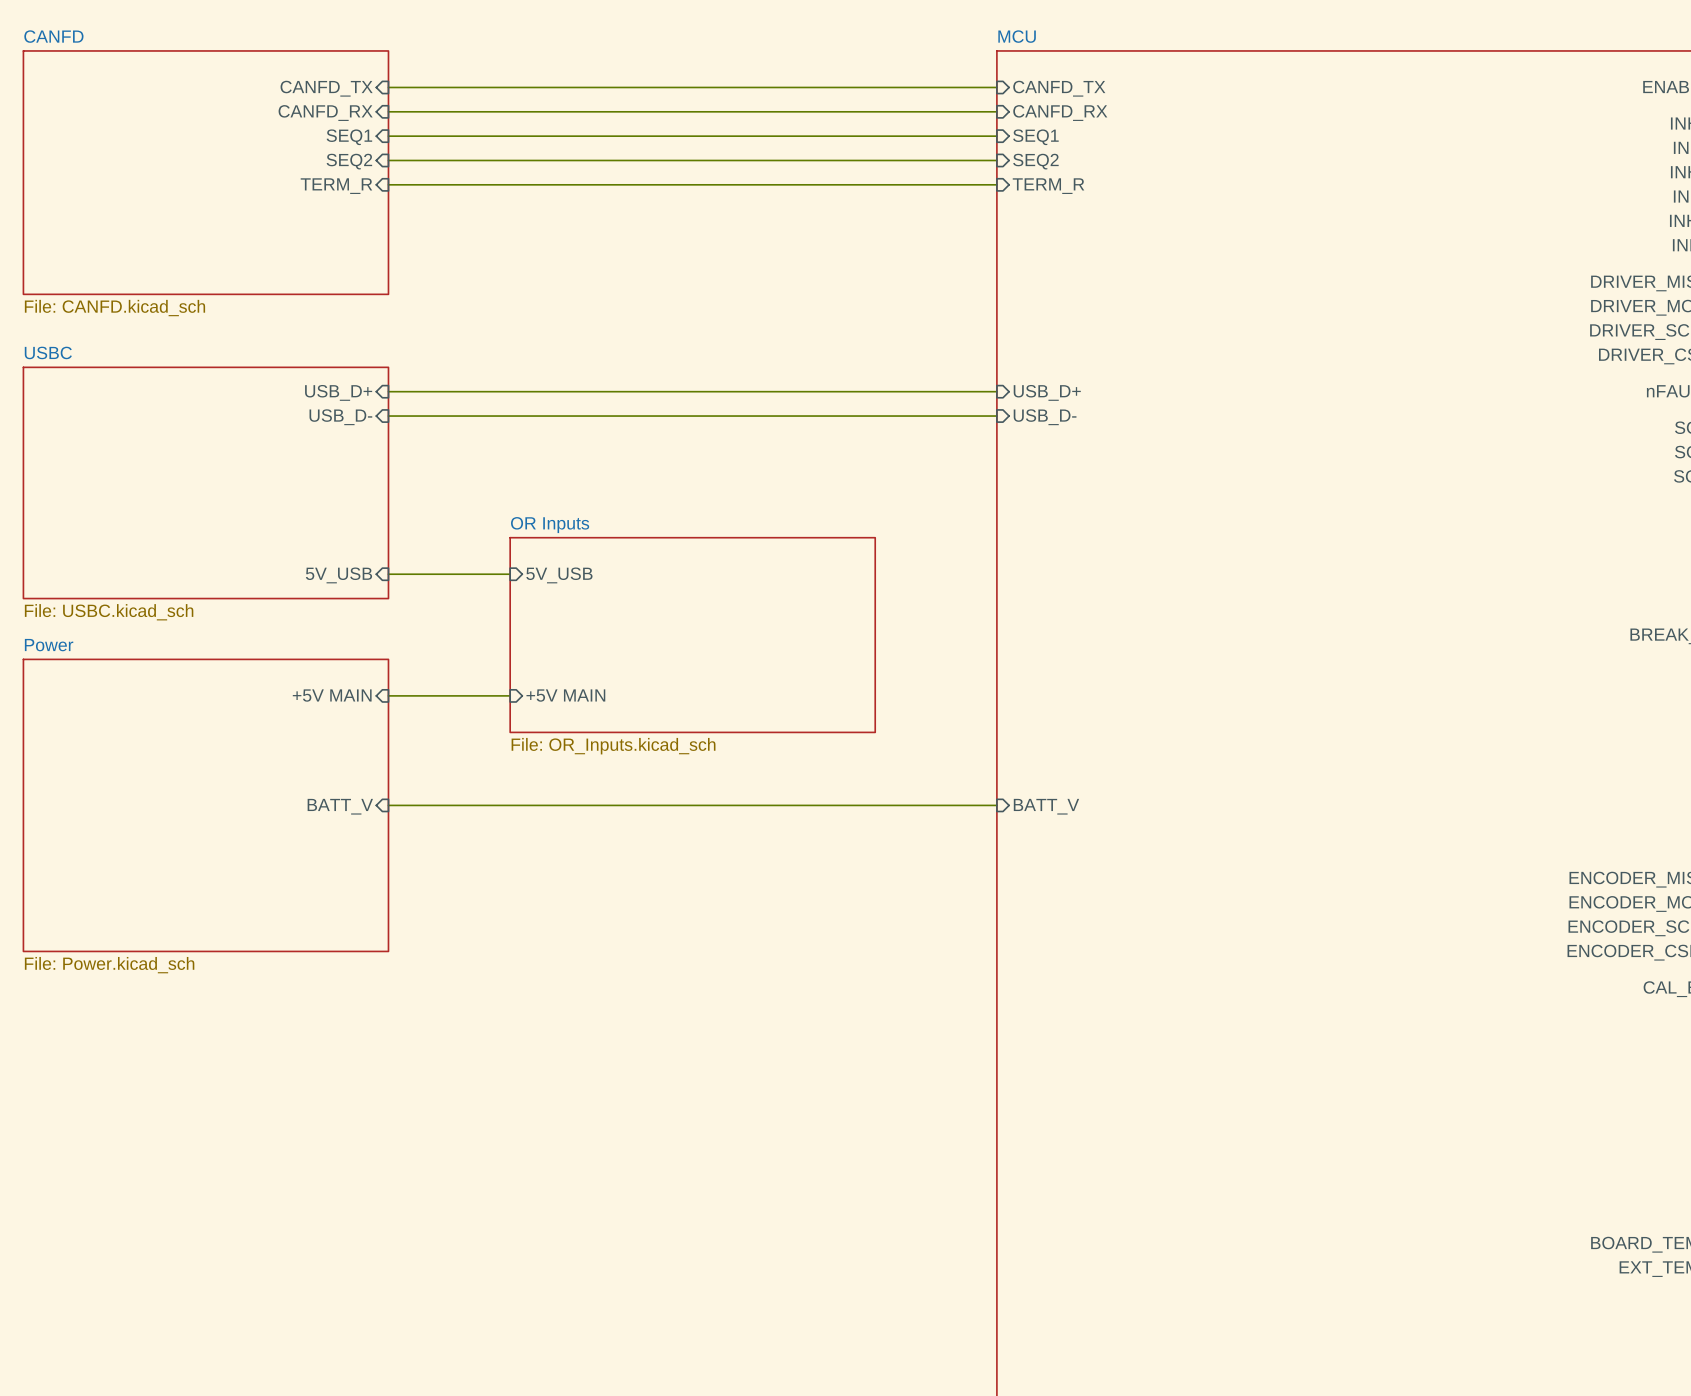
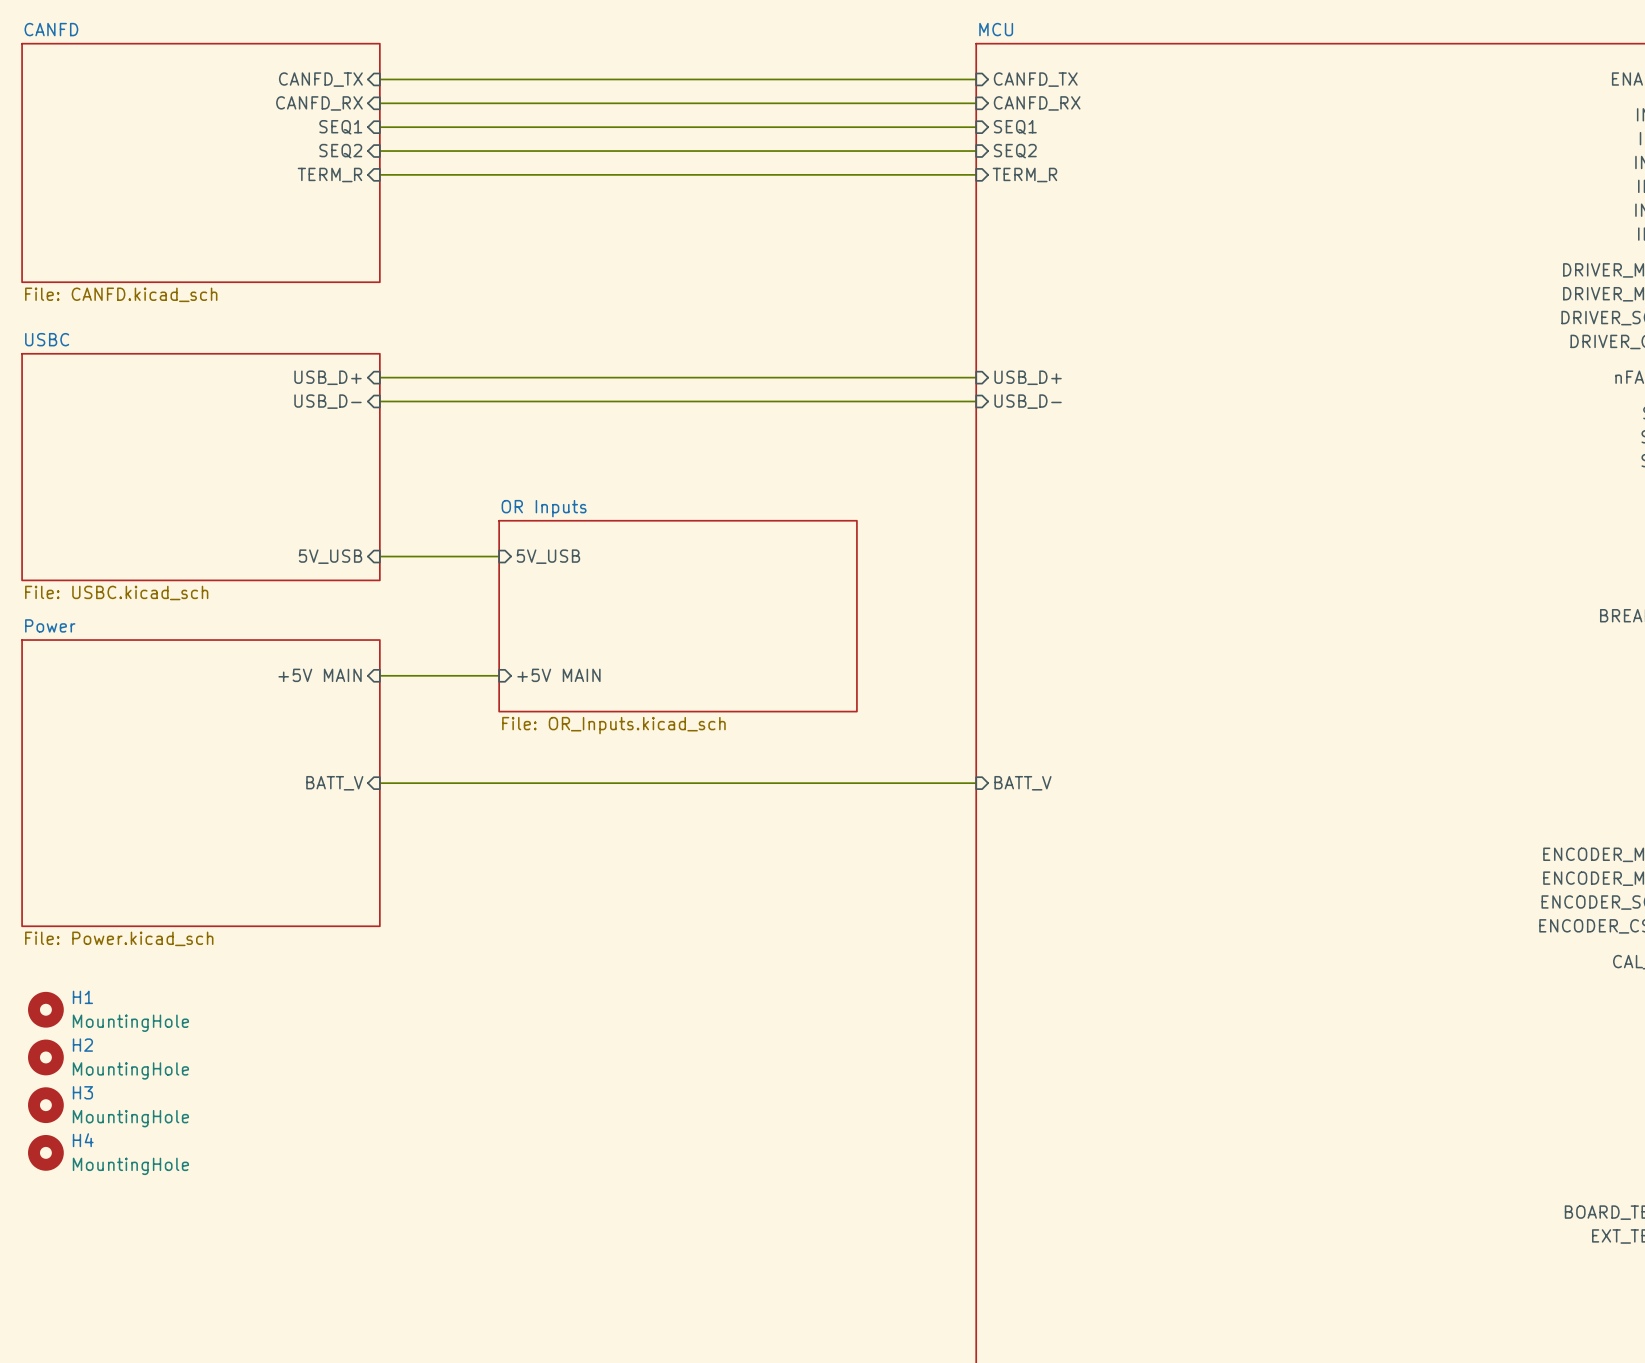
H1: none -> MountingHole (45, 1009)
H2: none -> MountingHole (45, 1057)
H3: none -> MountingHole (45, 1105)
H4: none -> MountingHole (45, 1152)

